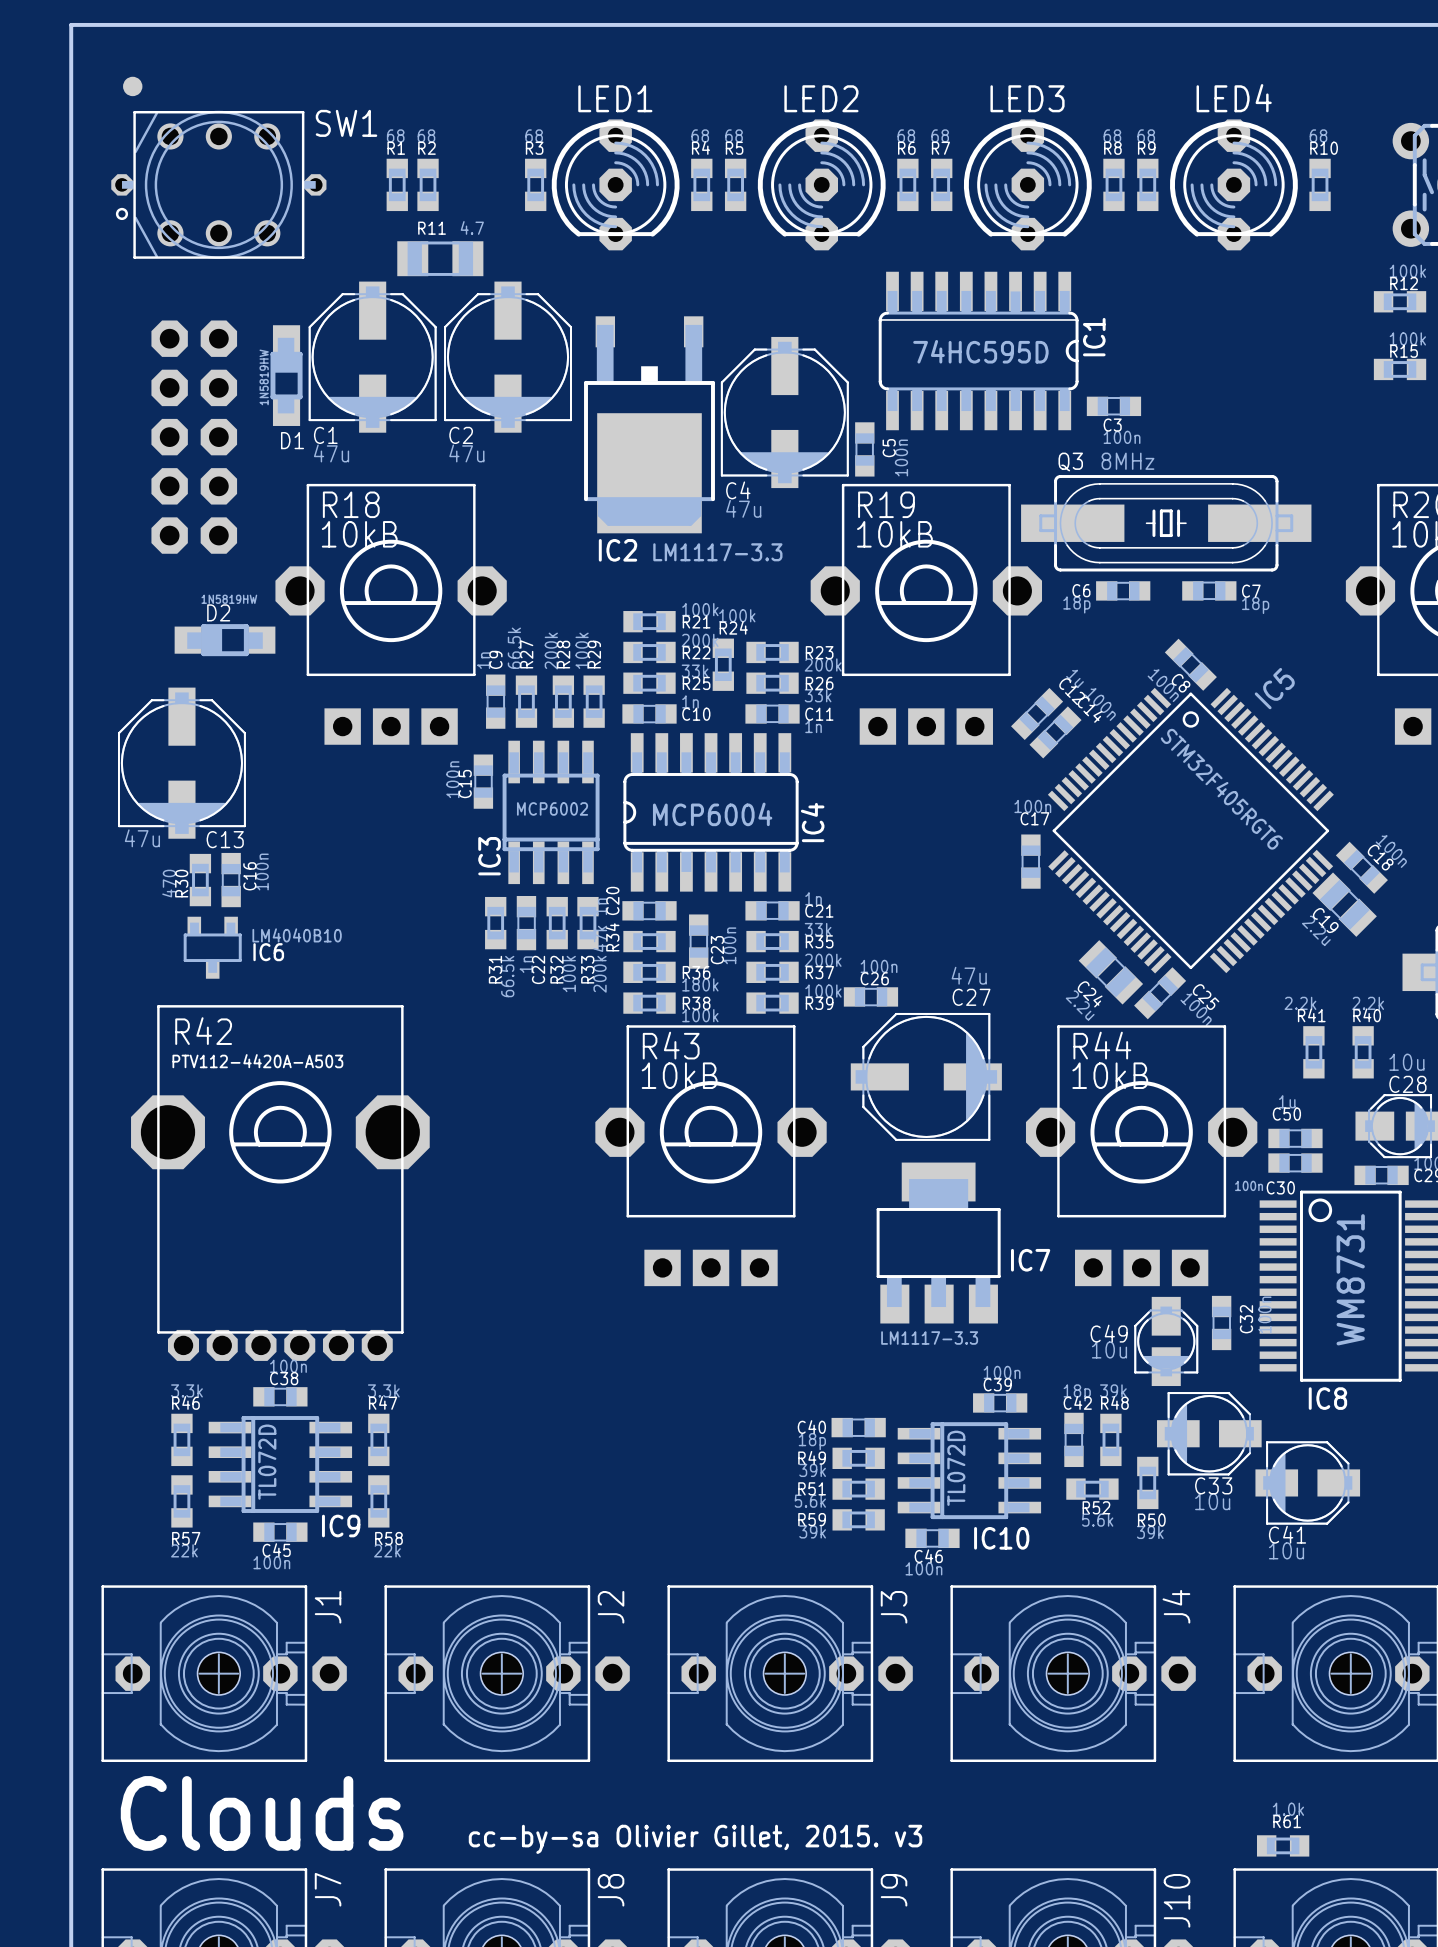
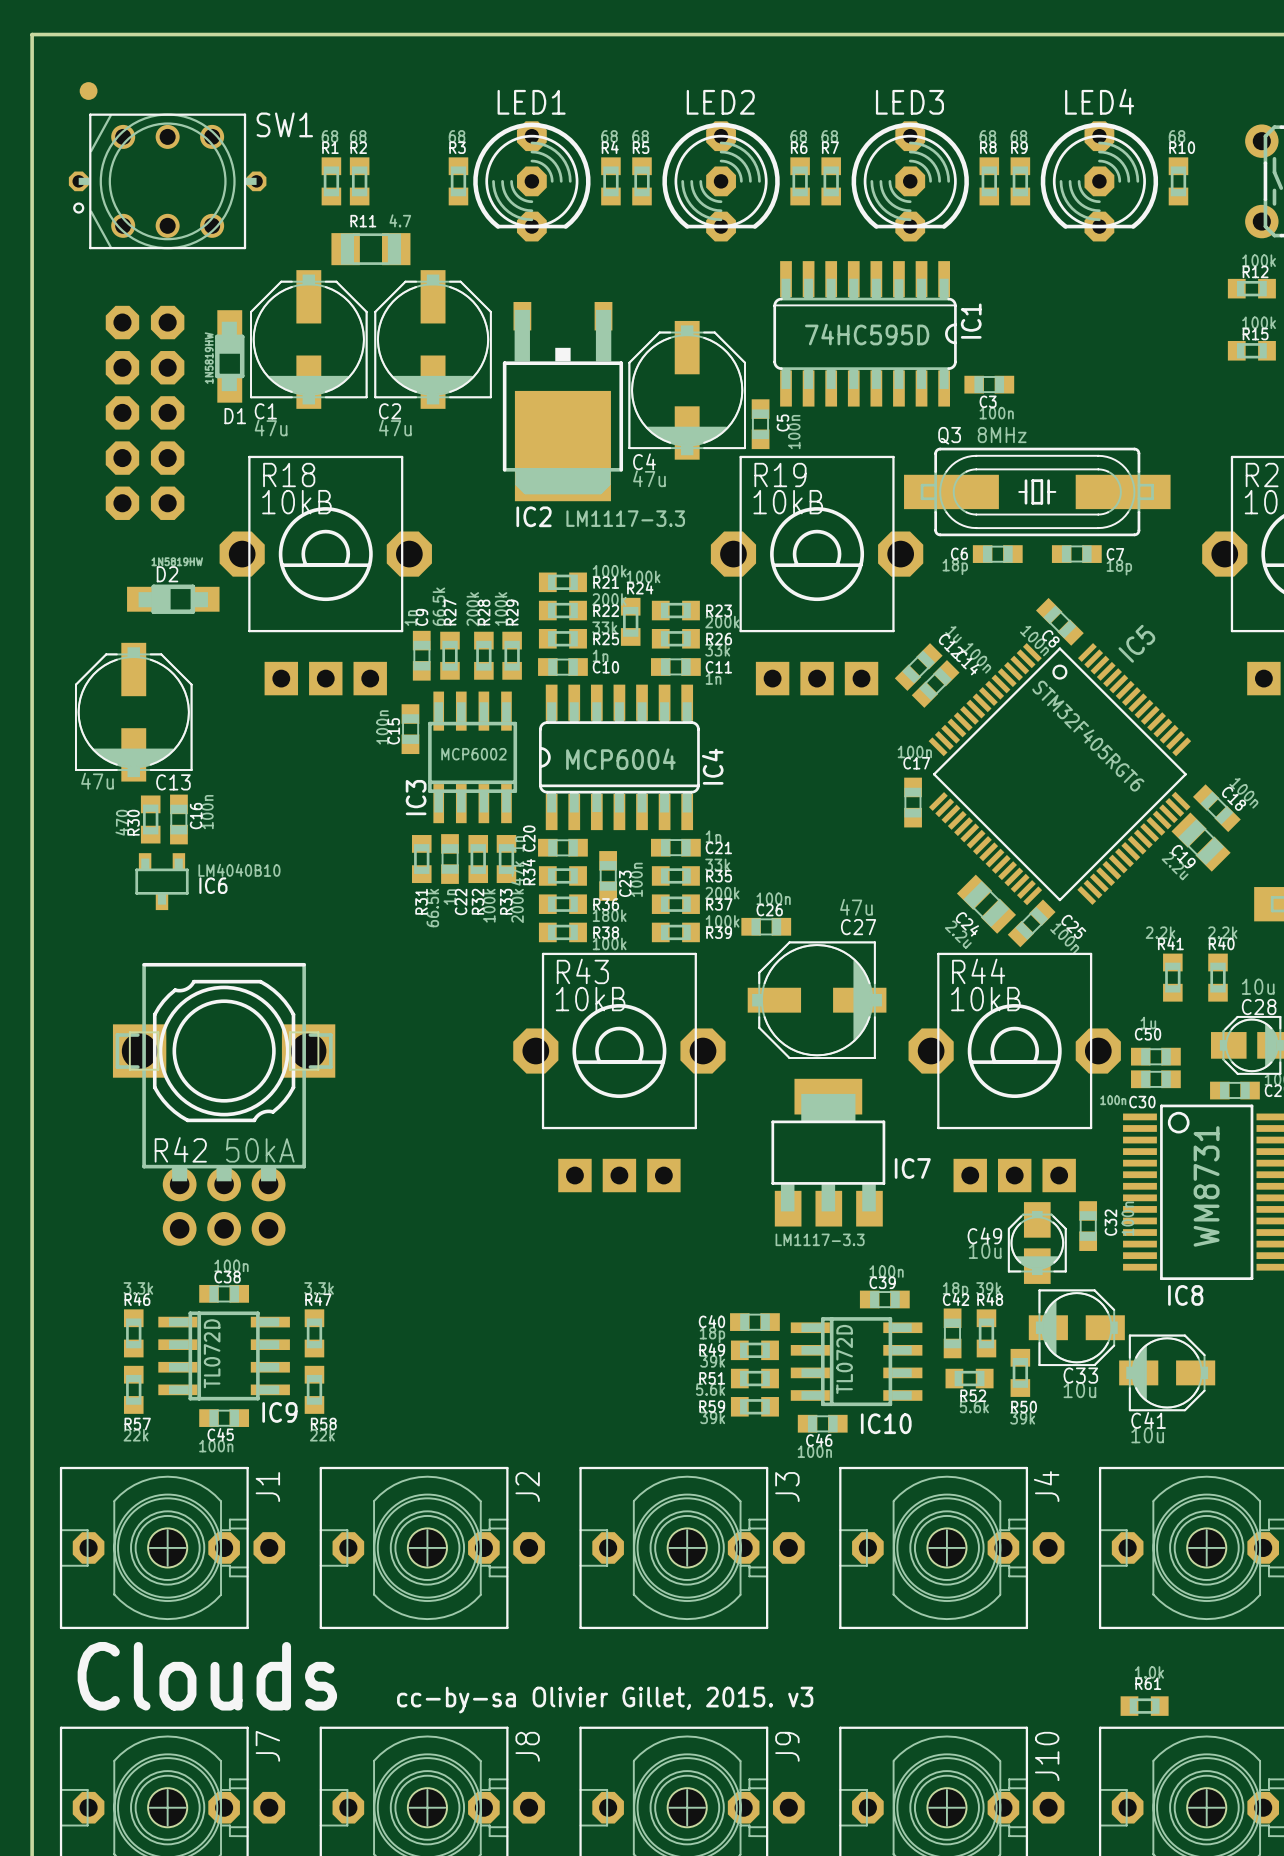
R42 footprint: [131, 1005, 430, 1361] -> [112, 962, 336, 1246]
R42 name position: R42 (203, 1031) -> R42 (180, 1149)
R42 value: PTV112-4420A-A503 (257, 1061) -> 50kA (260, 1150)

